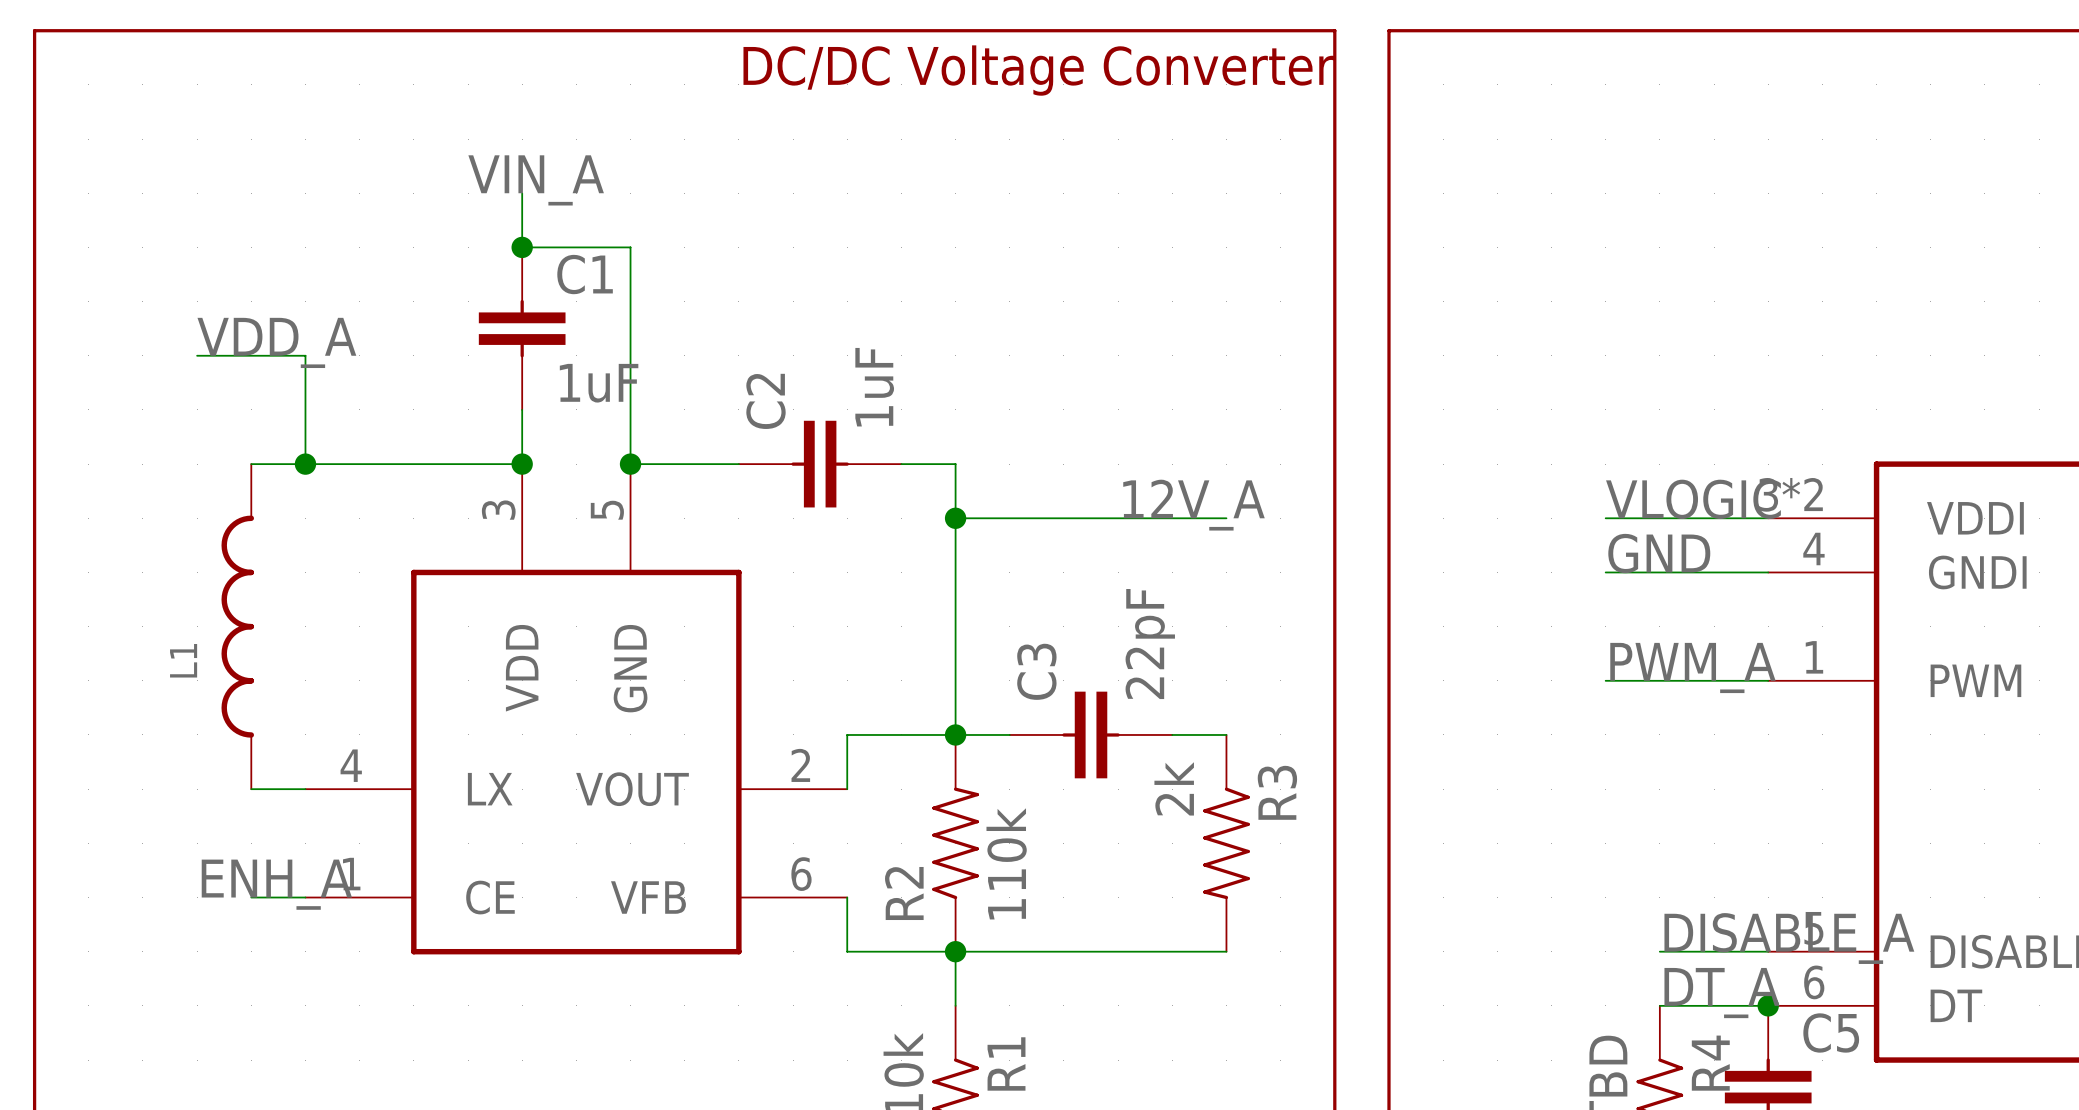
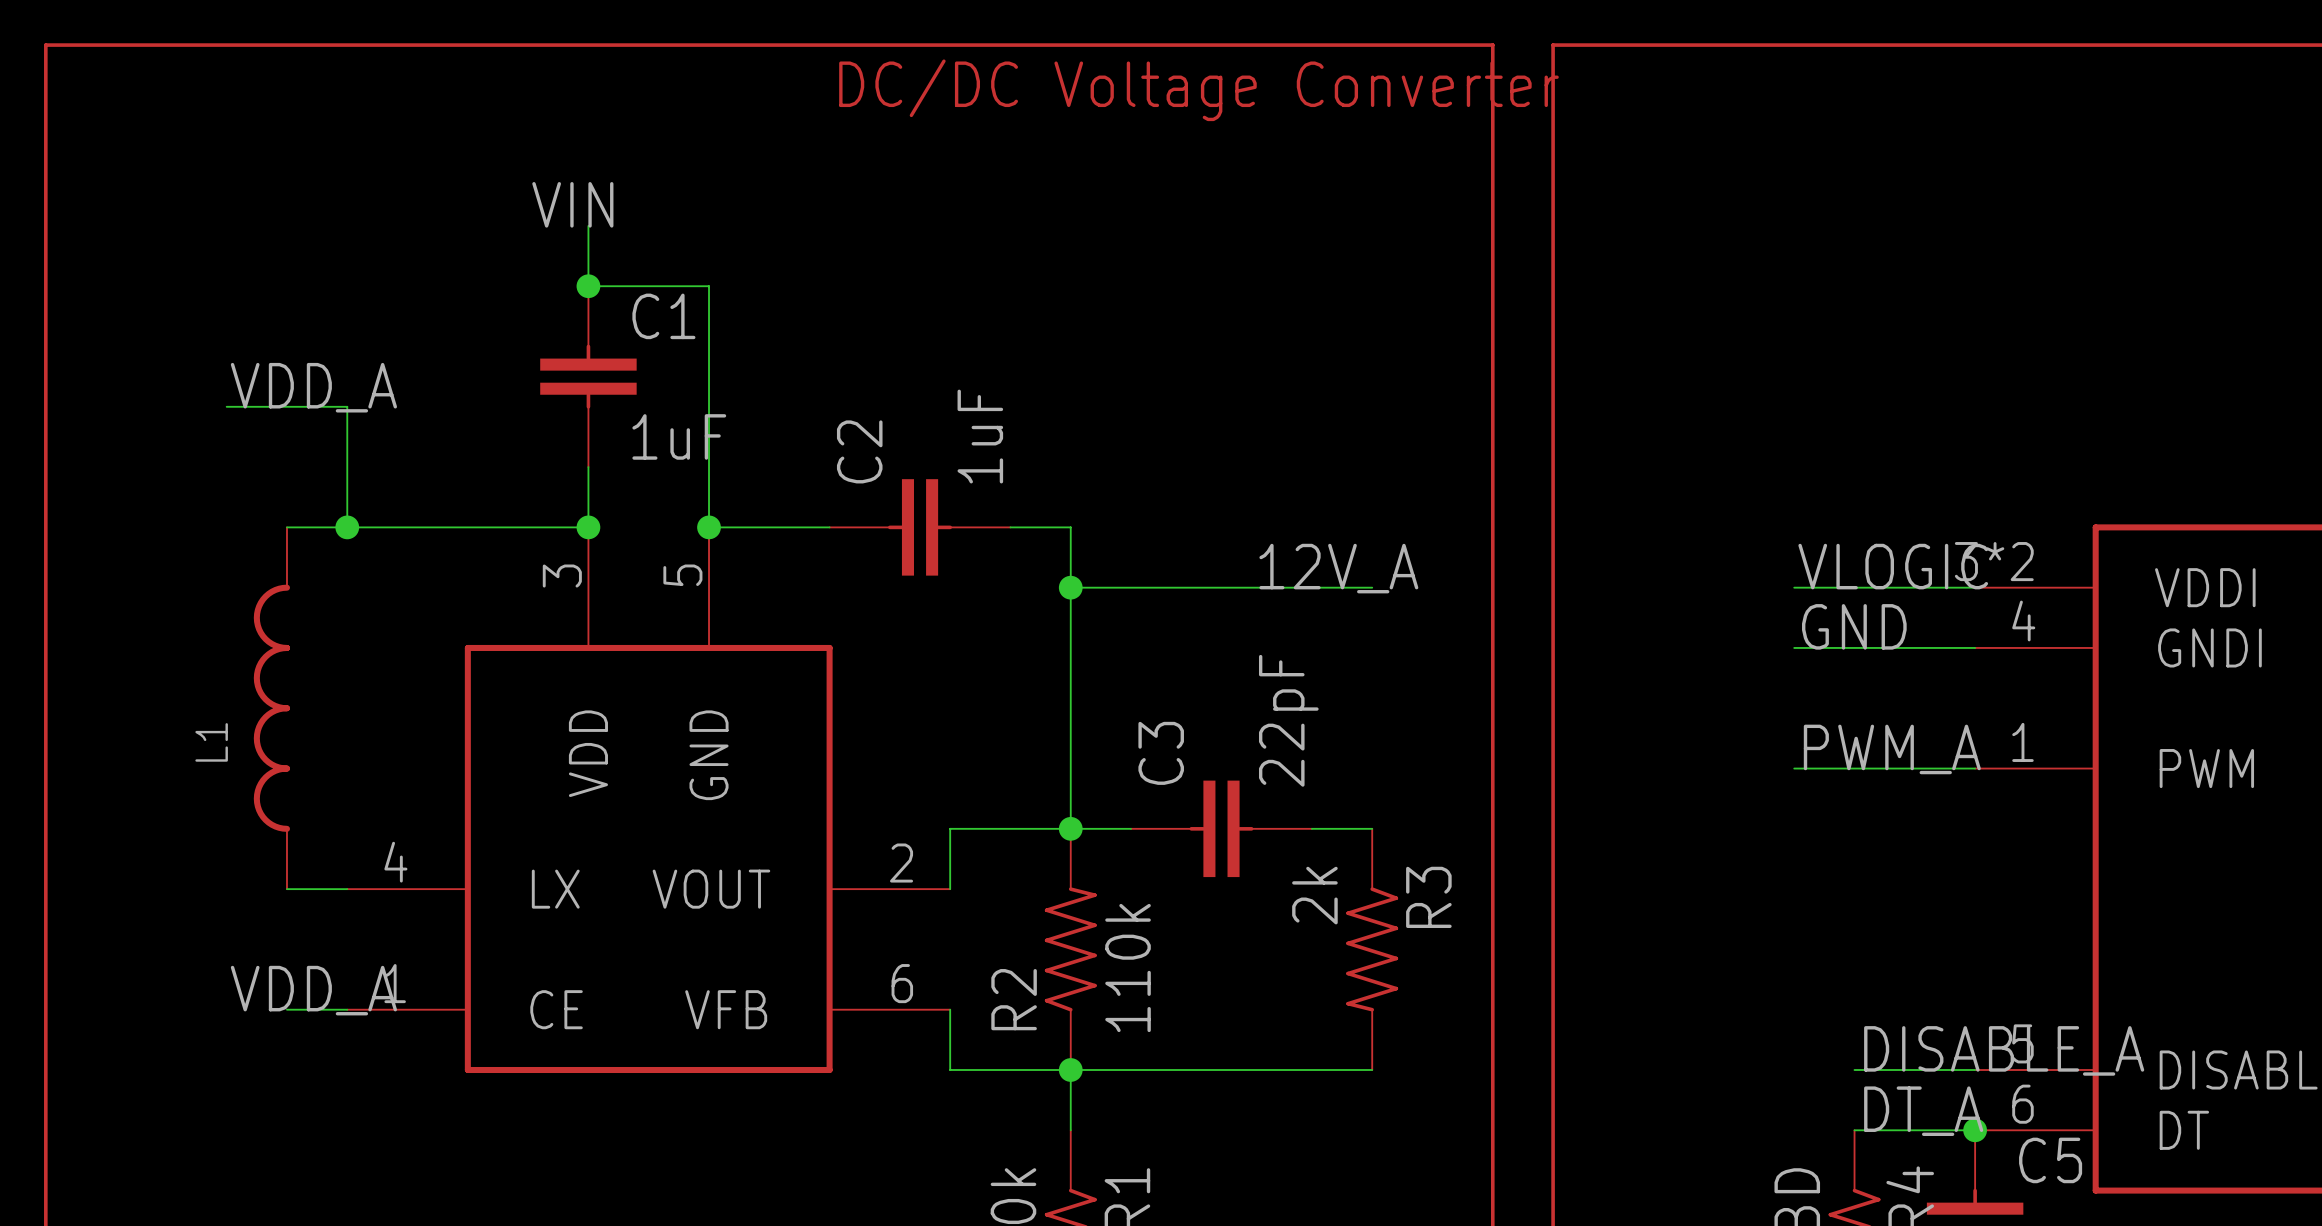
label: VIN_A (536, 180) -> VIN (572, 204)
label: ENH_A (276, 884) -> VDD_A (313, 990)

